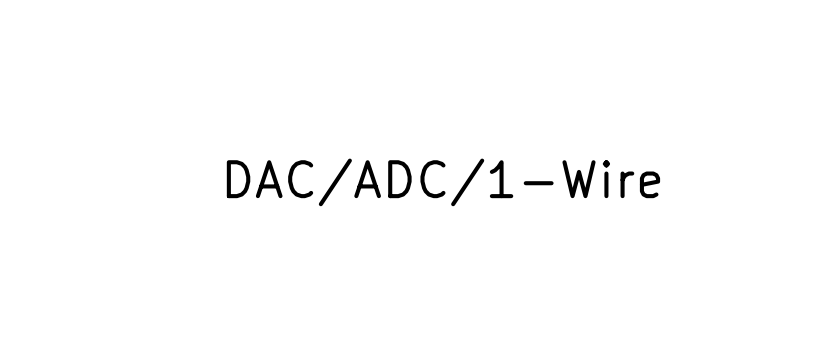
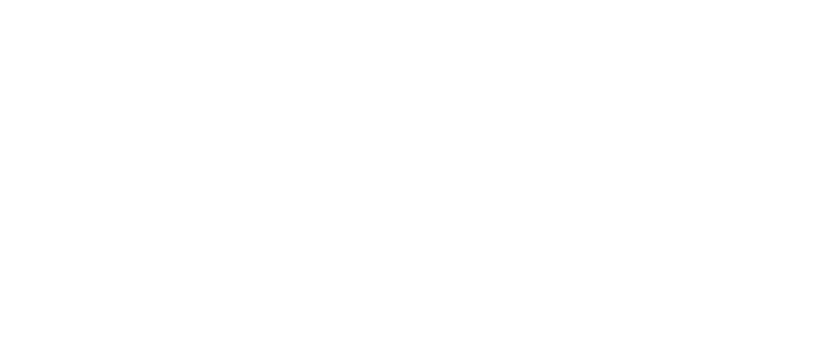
label: DAC/ADC/1-Wire (443, 182) -> none

